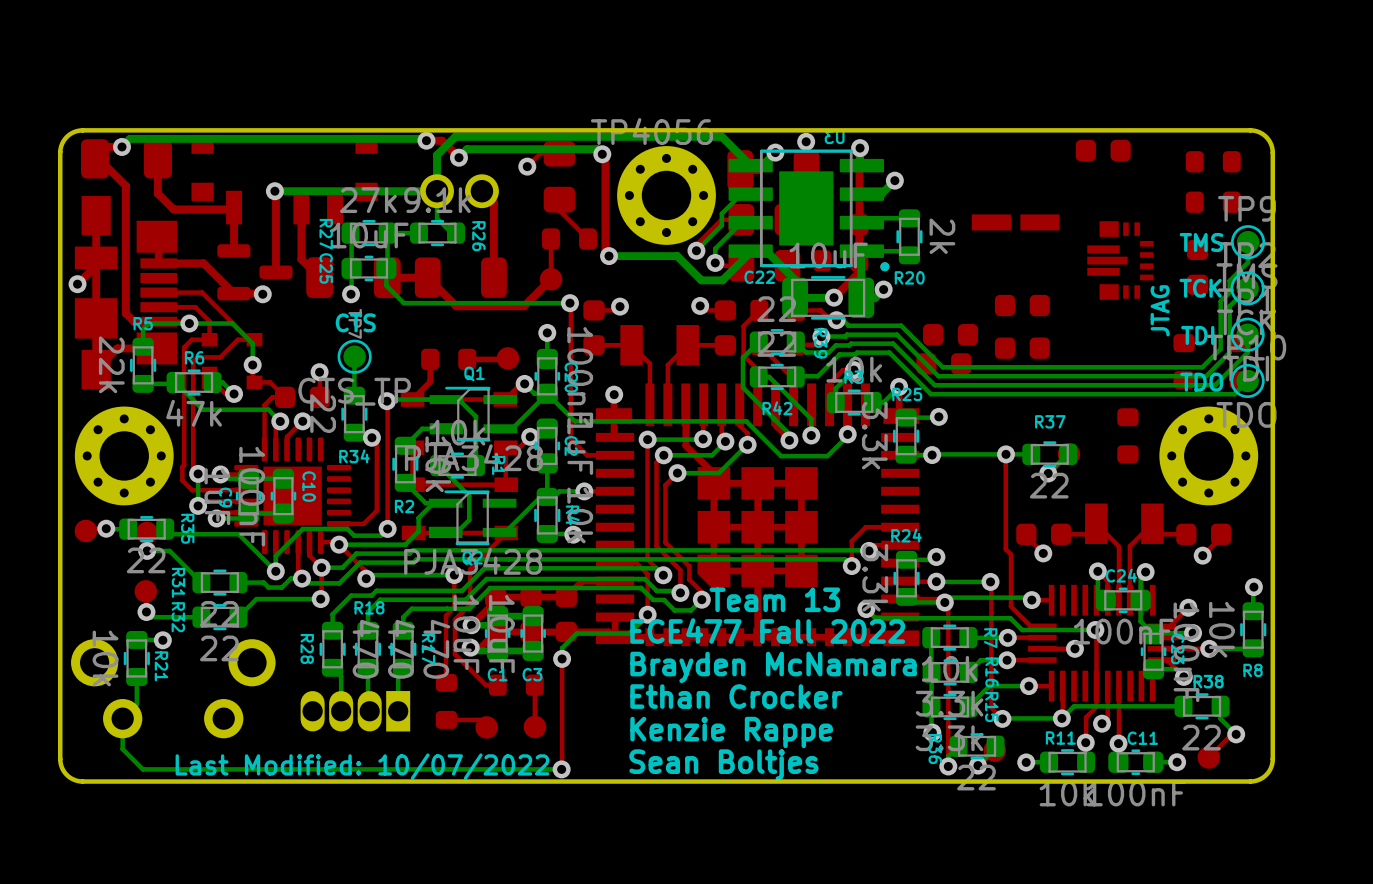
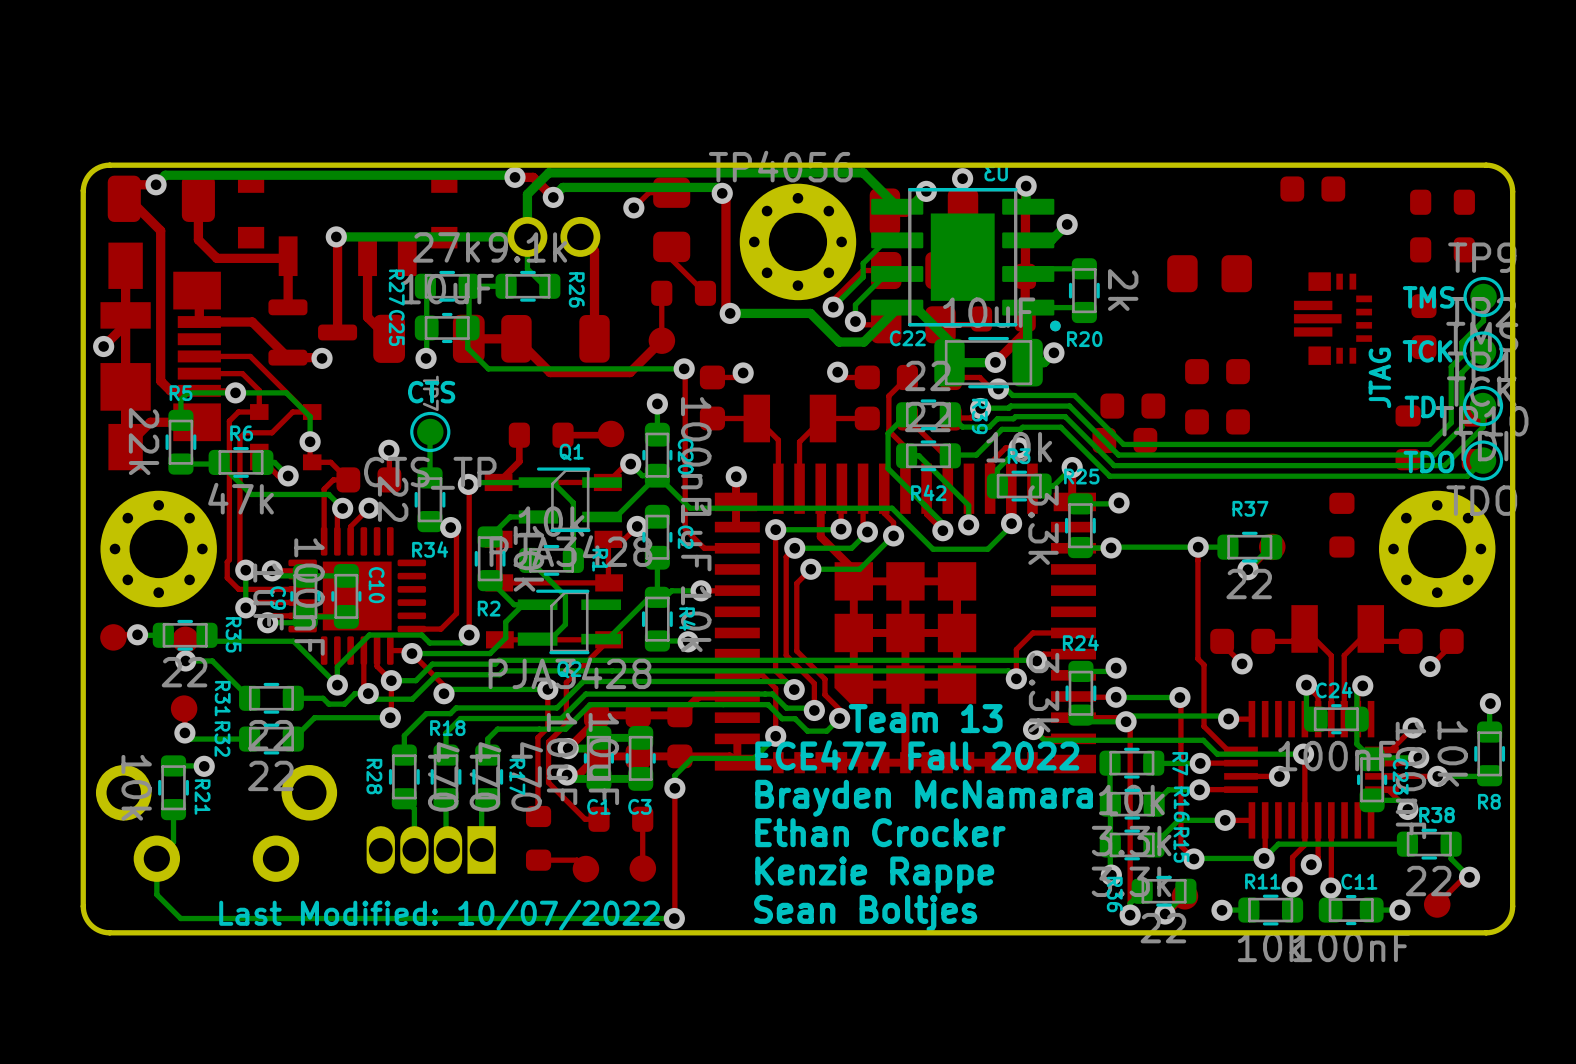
part footprint: [971, 214, 1060, 231] -> [1167, 255, 1252, 293]

